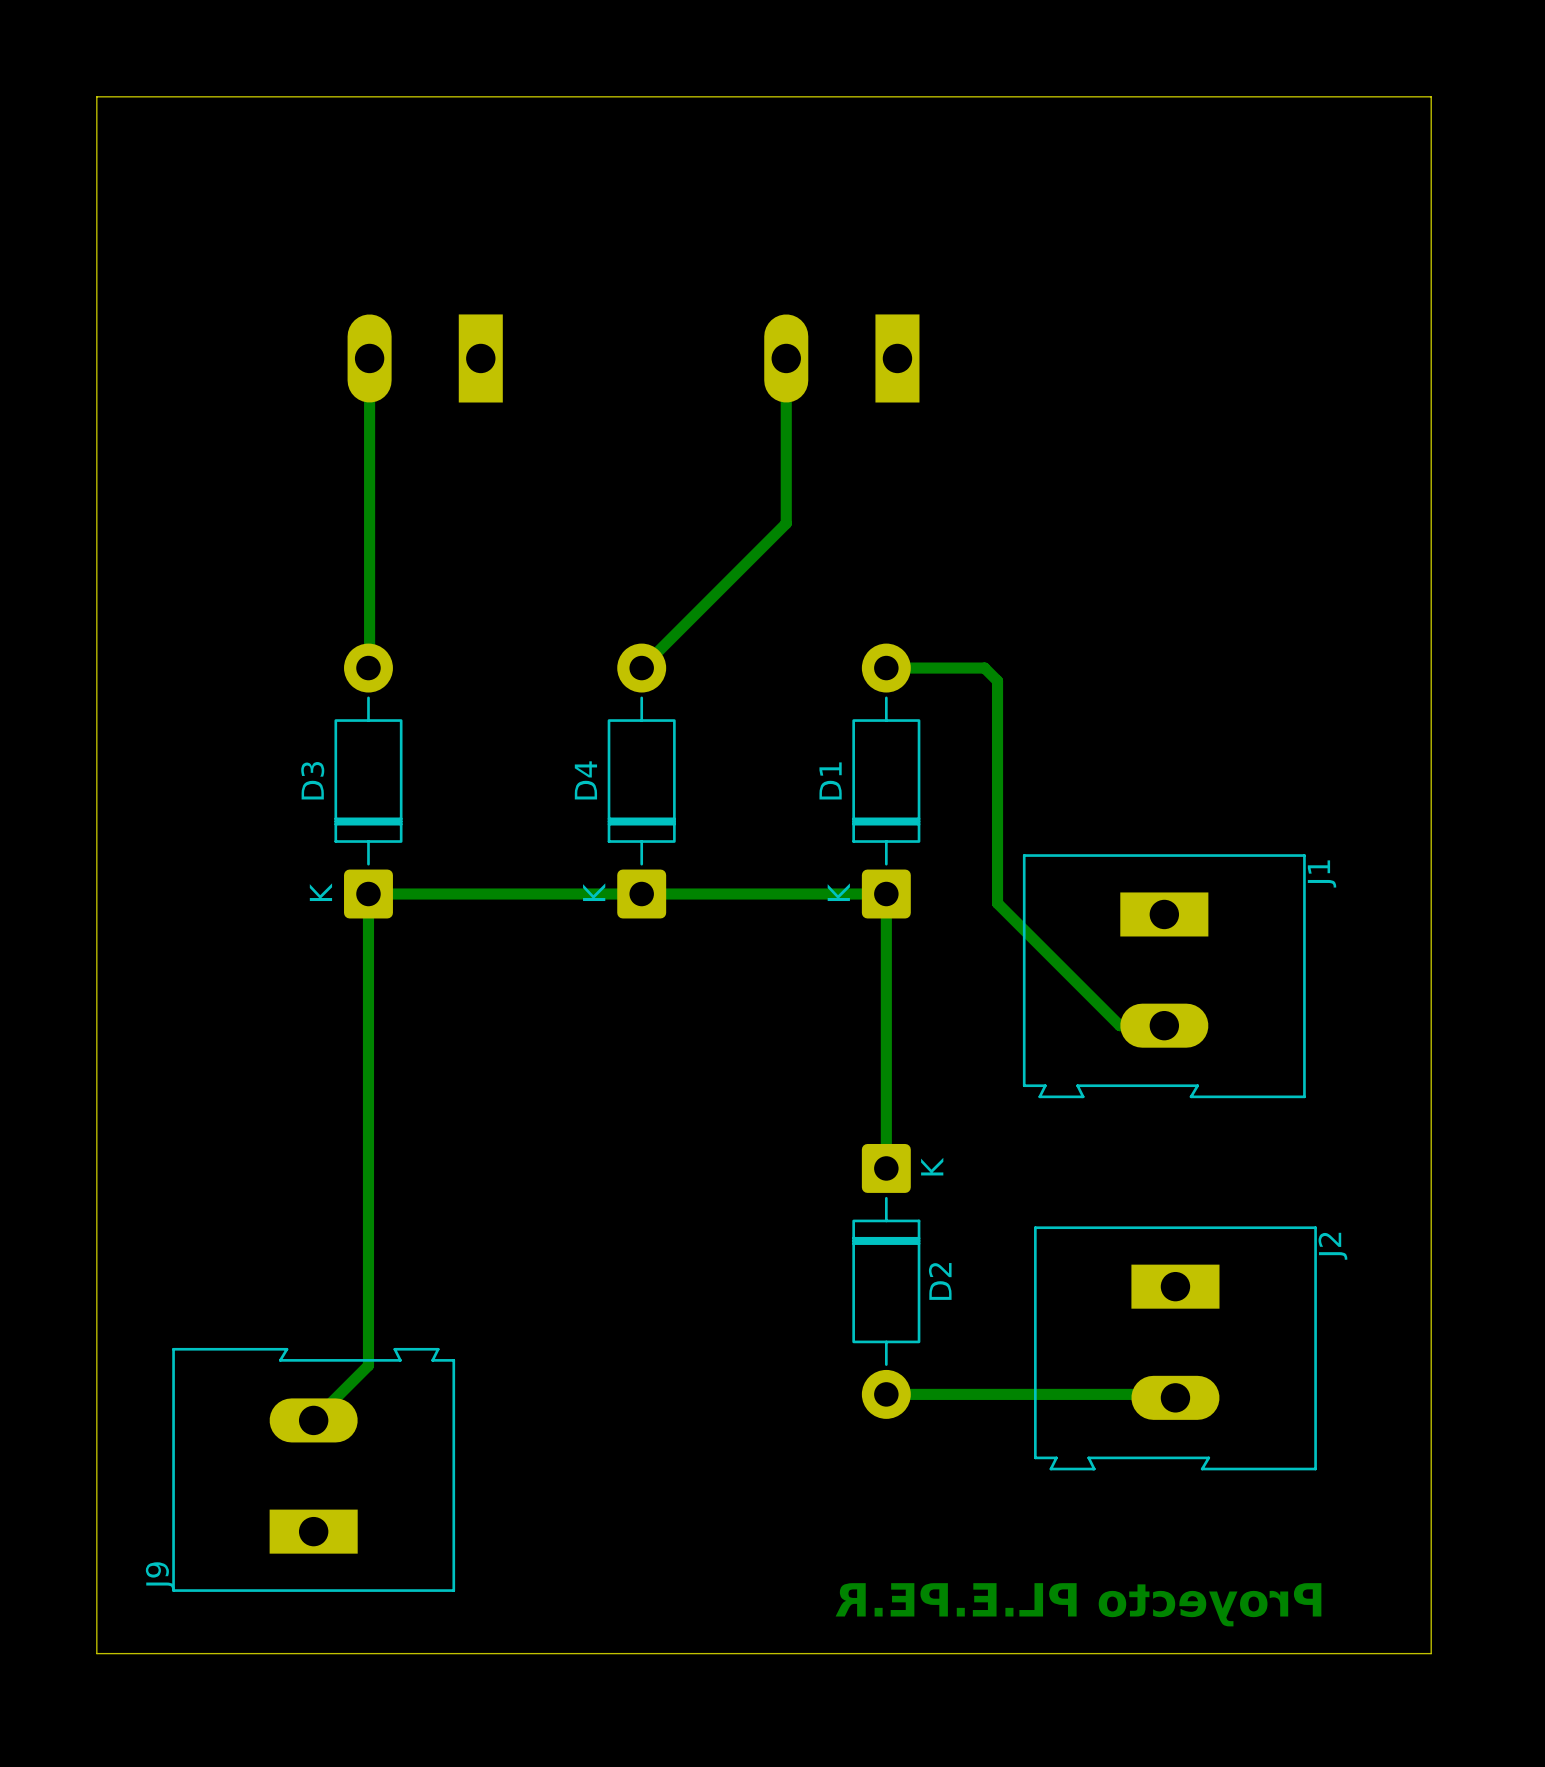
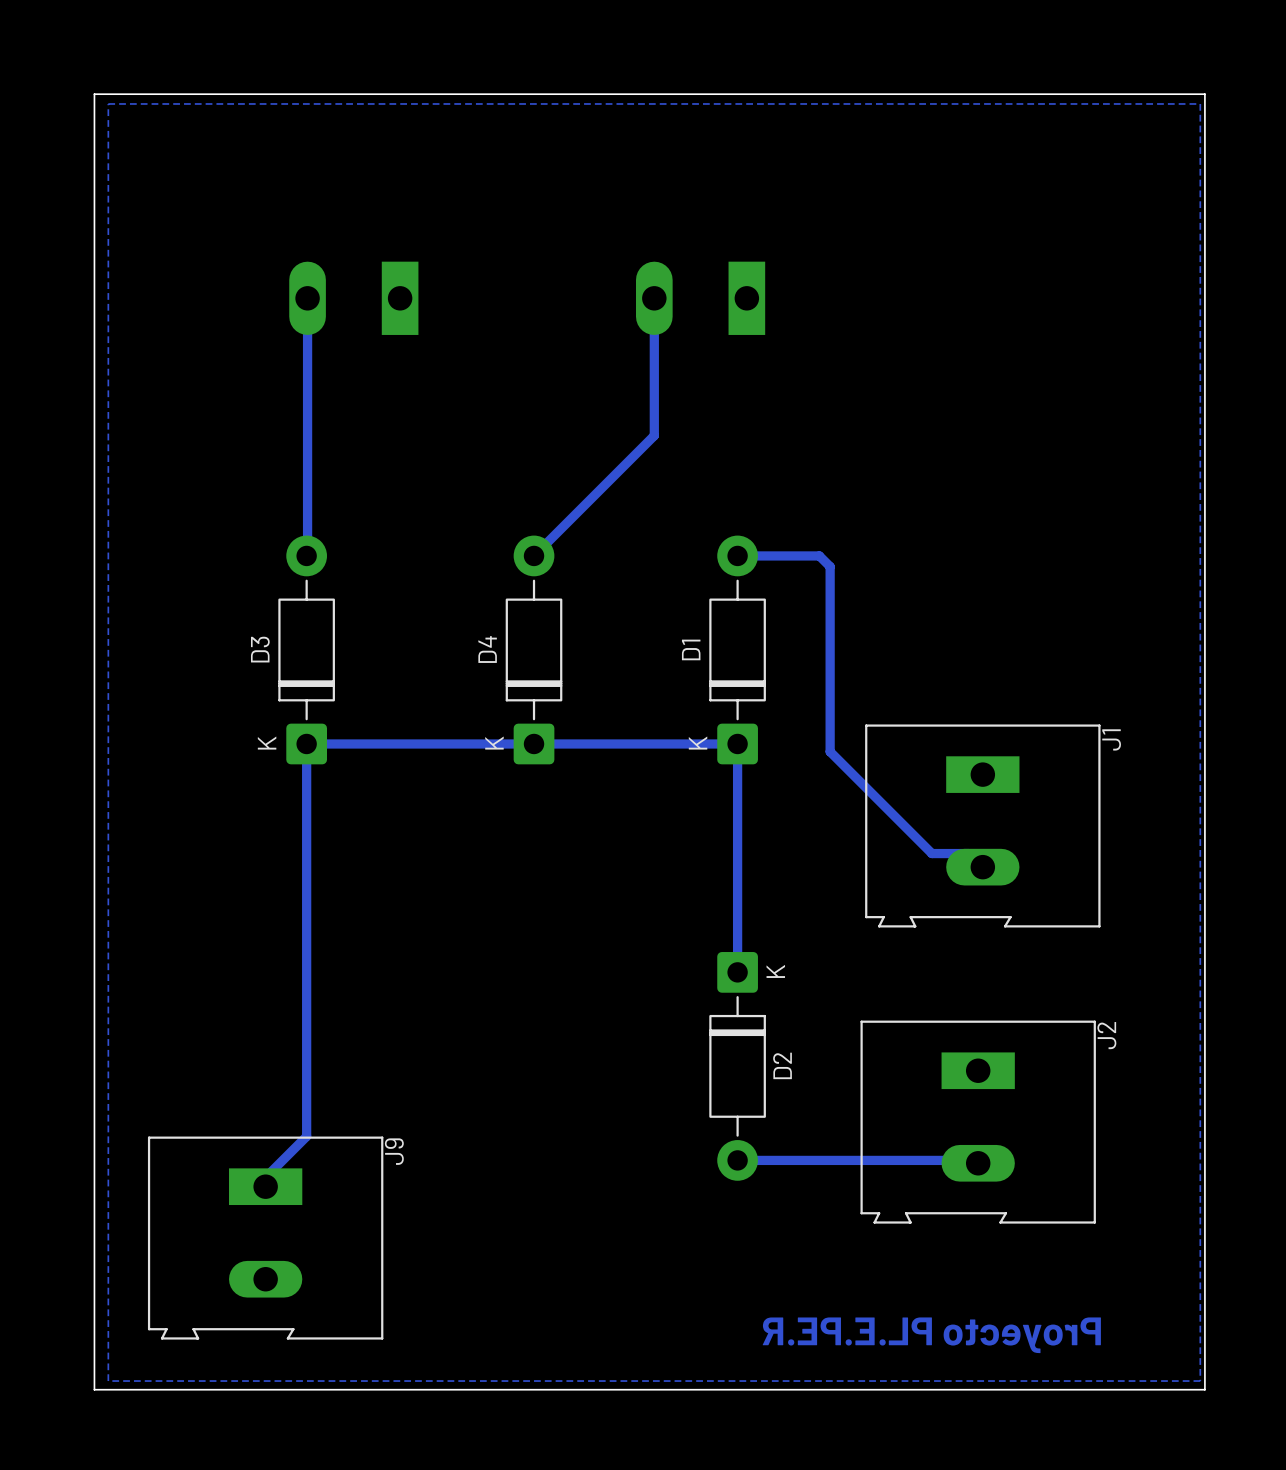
board edge: (96, 96) (1431, 96) (1431, 1653) (96, 1653) (96, 96) -> (94, 94) (1204, 94) (1204, 1389) (94, 1389) (94, 94)
bottom zone outline: none -> (108, 103) (1200, 103) (1200, 1381) (108, 1381) (108, 103)
J1 position: (1164, 976) -> (982, 825)
J9 rotation: 0° (313, 1469) -> 180° (265, 1238)

